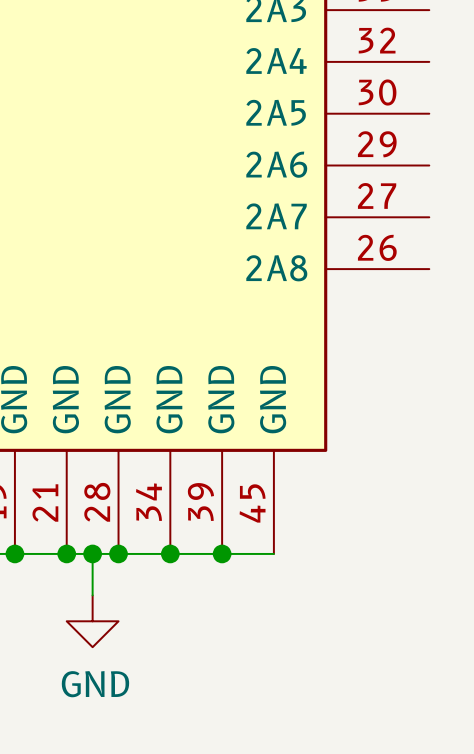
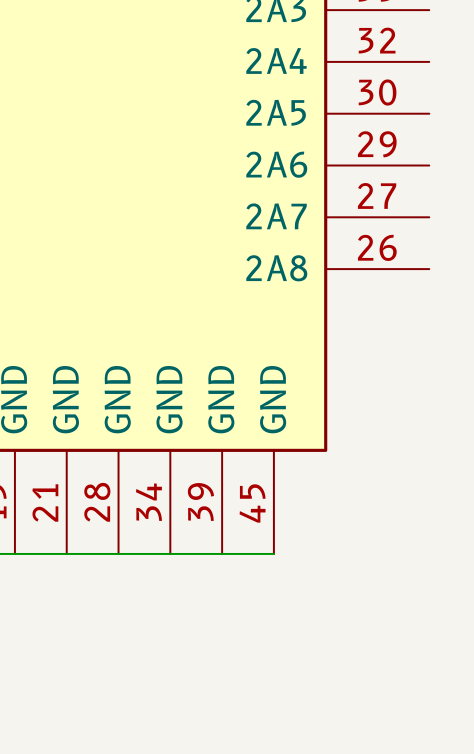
junction: (14, 553) -> none
junction: (66, 553) -> none
wire: (92, 553) (92, 595) -> none
junction: (92, 553) -> none
junction: (118, 553) -> none
junction: (170, 553) -> none
junction: (222, 553) -> none
power symbol: GND (92, 621) -> none

